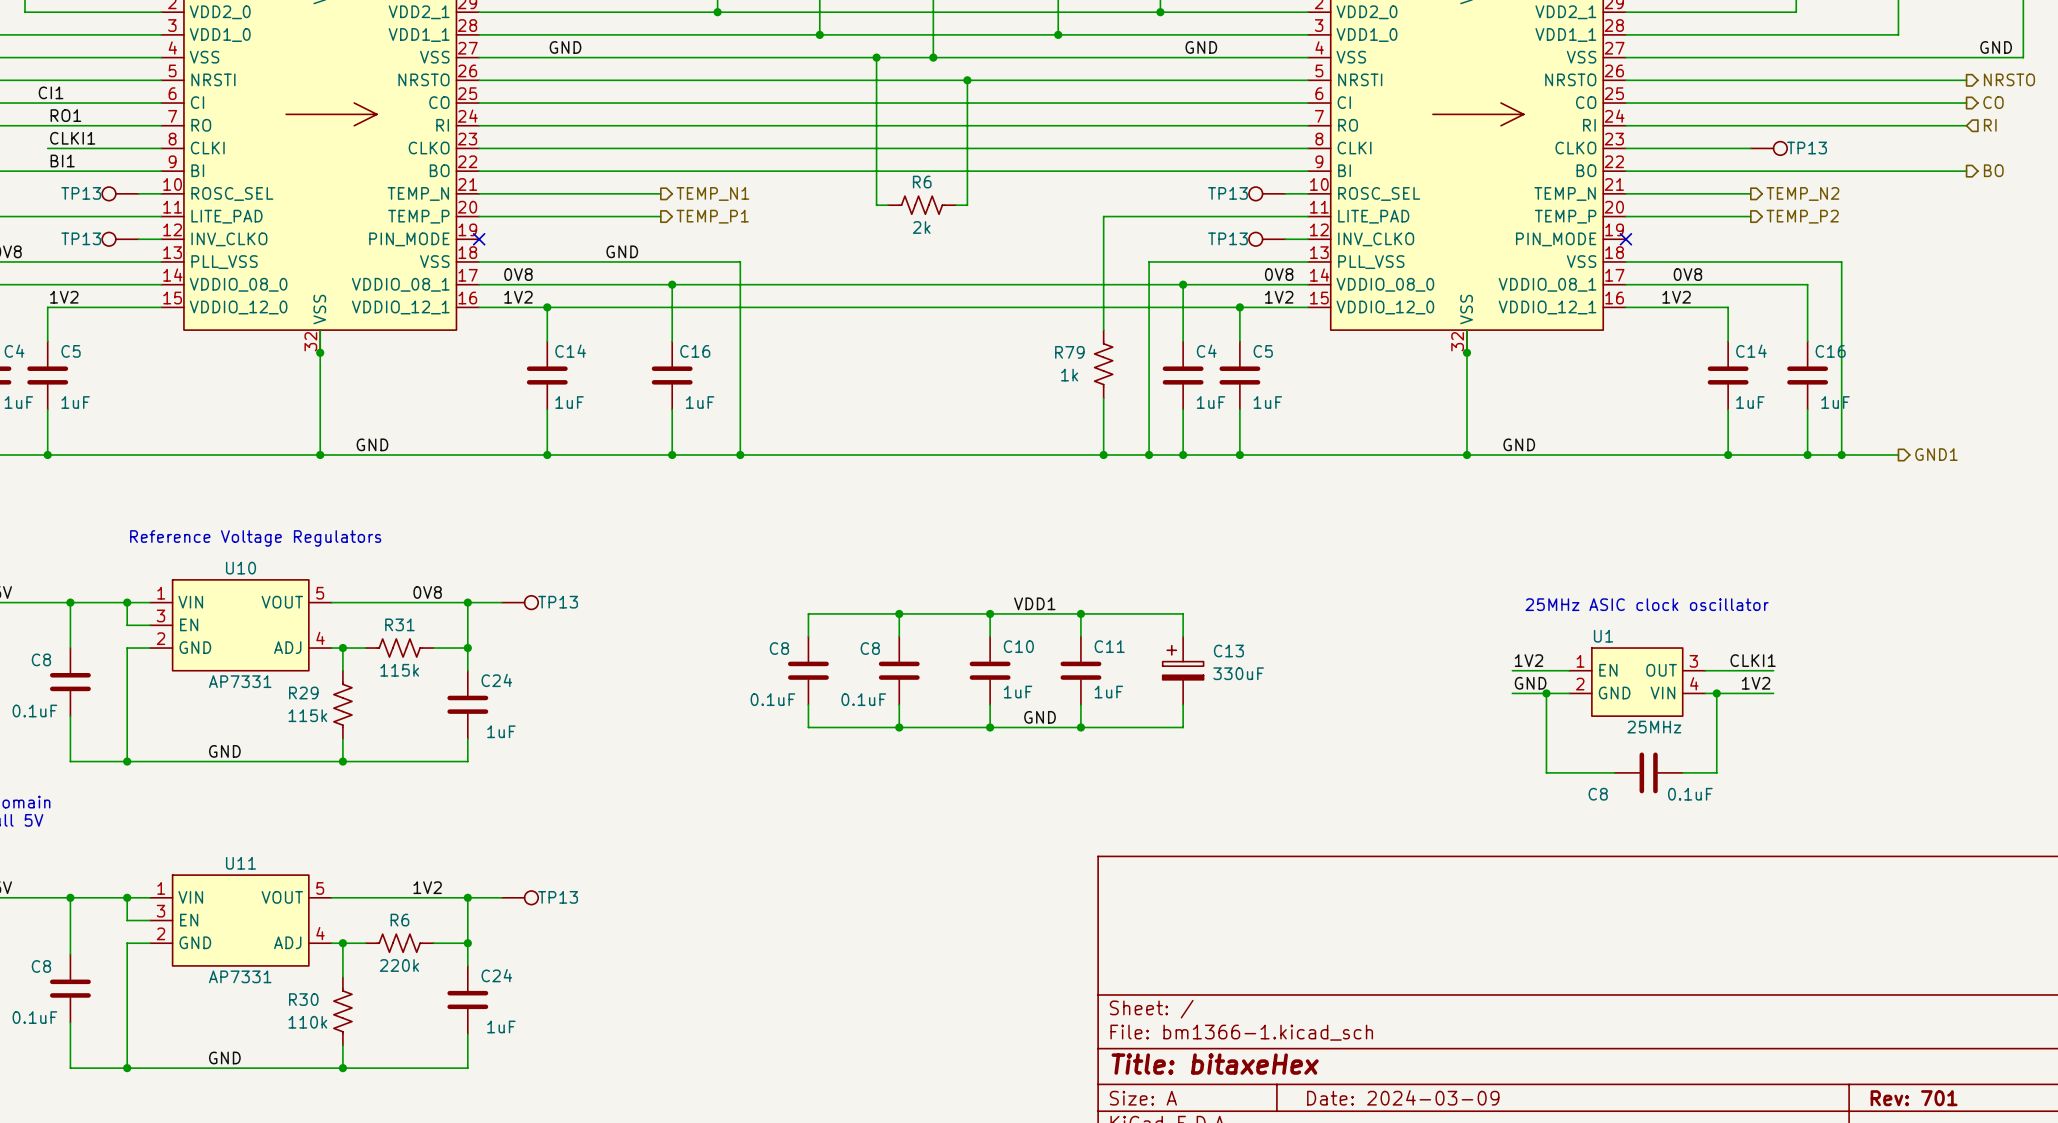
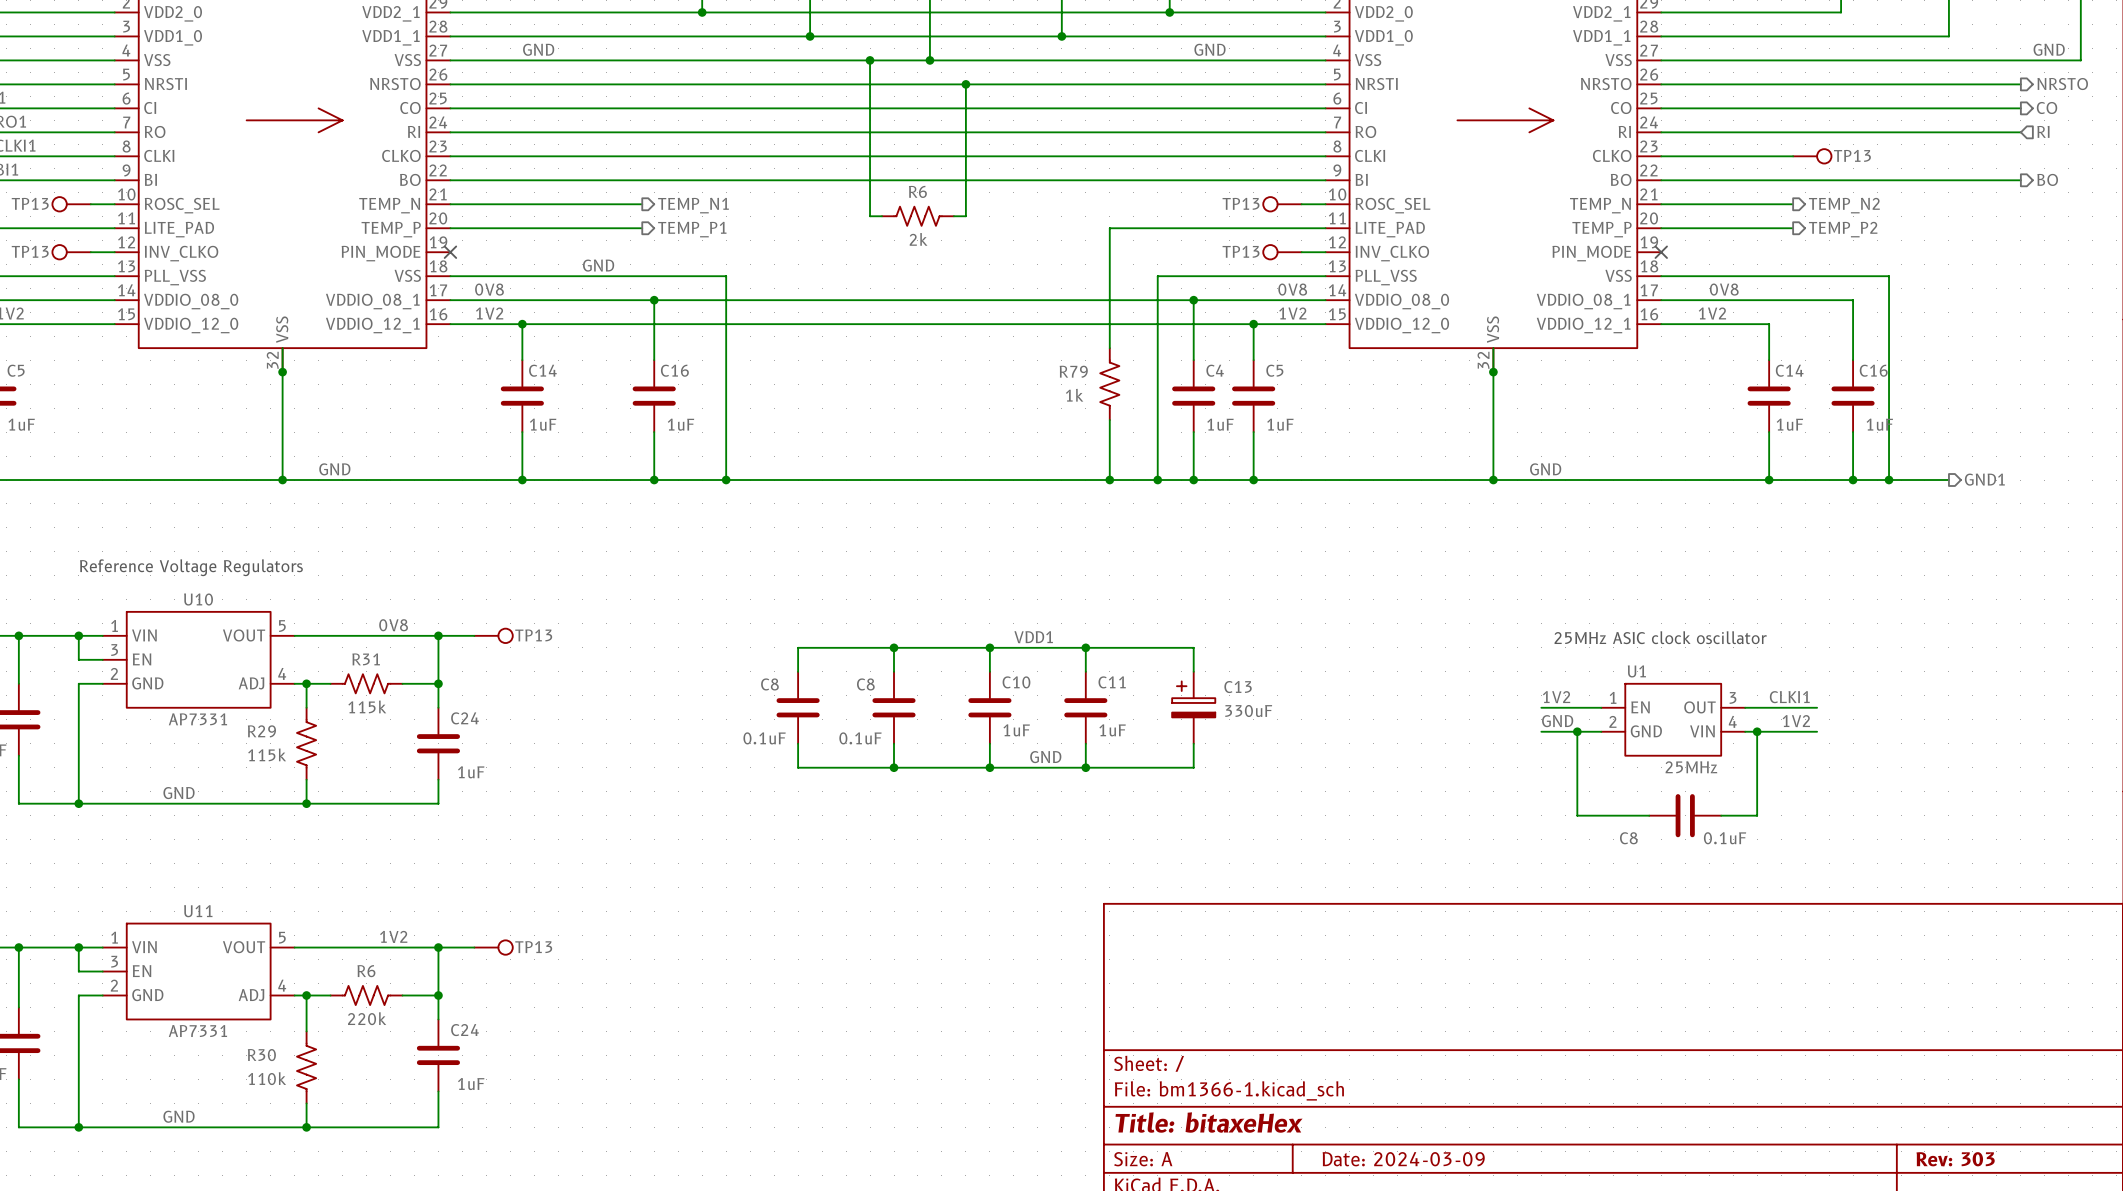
title block: Rev: 701 (1914, 1098) -> Rev: 303 (1955, 1159)

